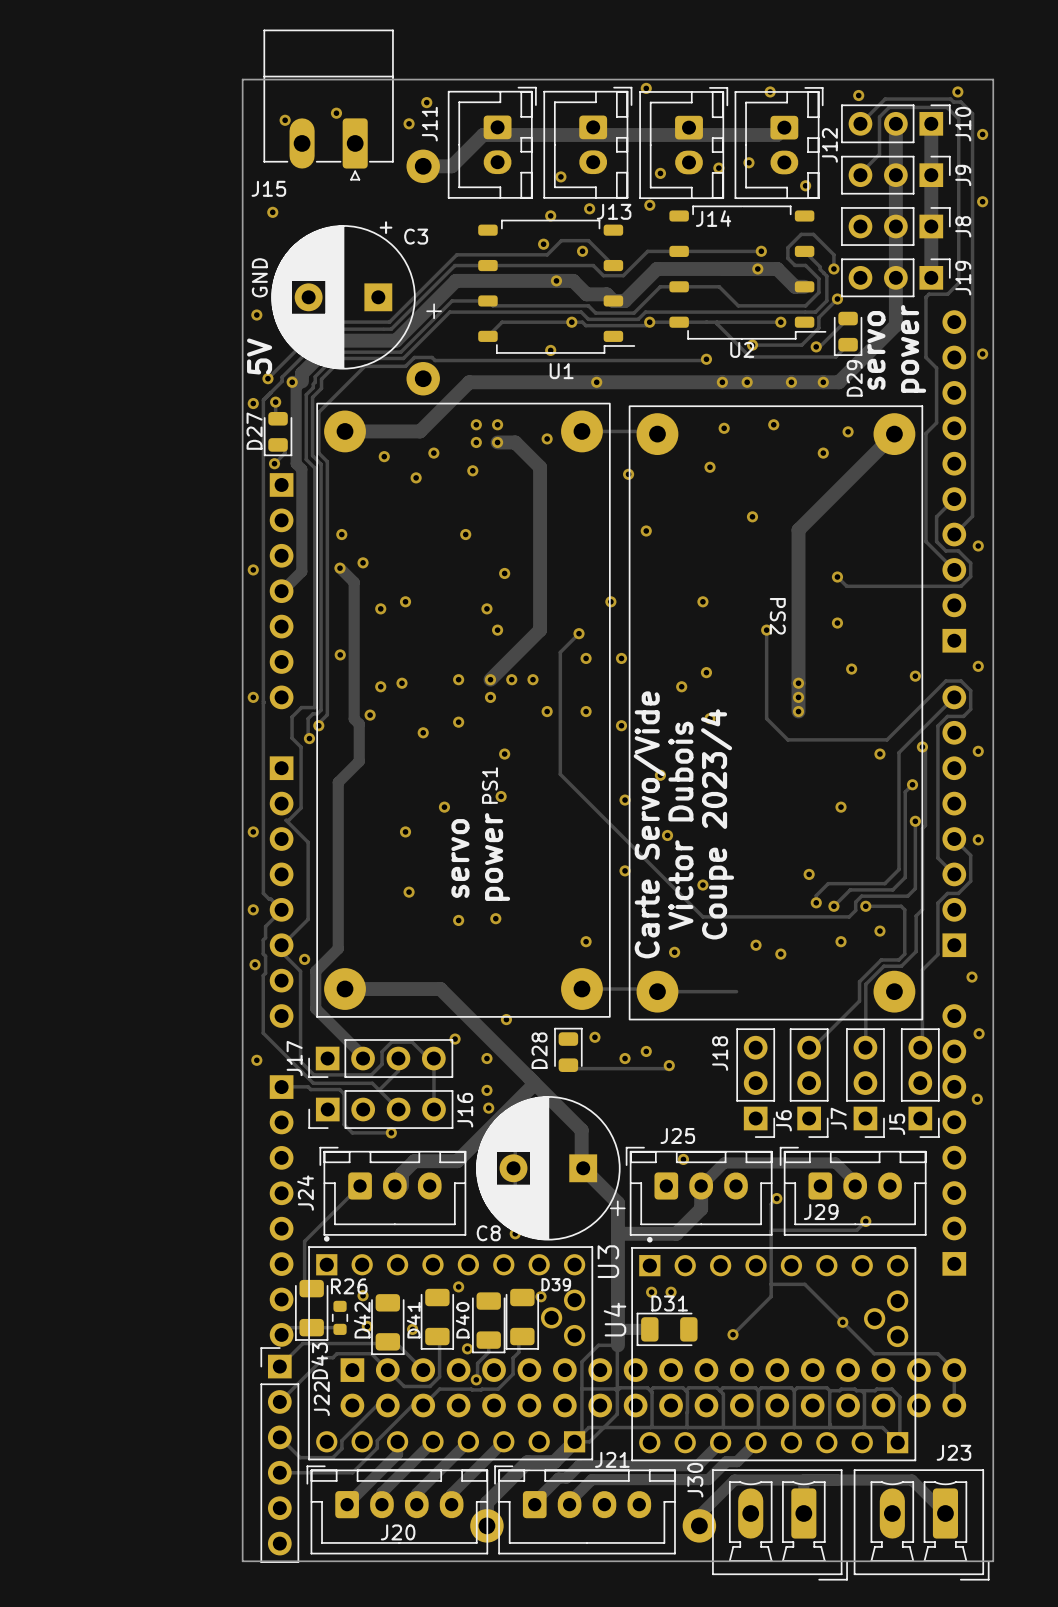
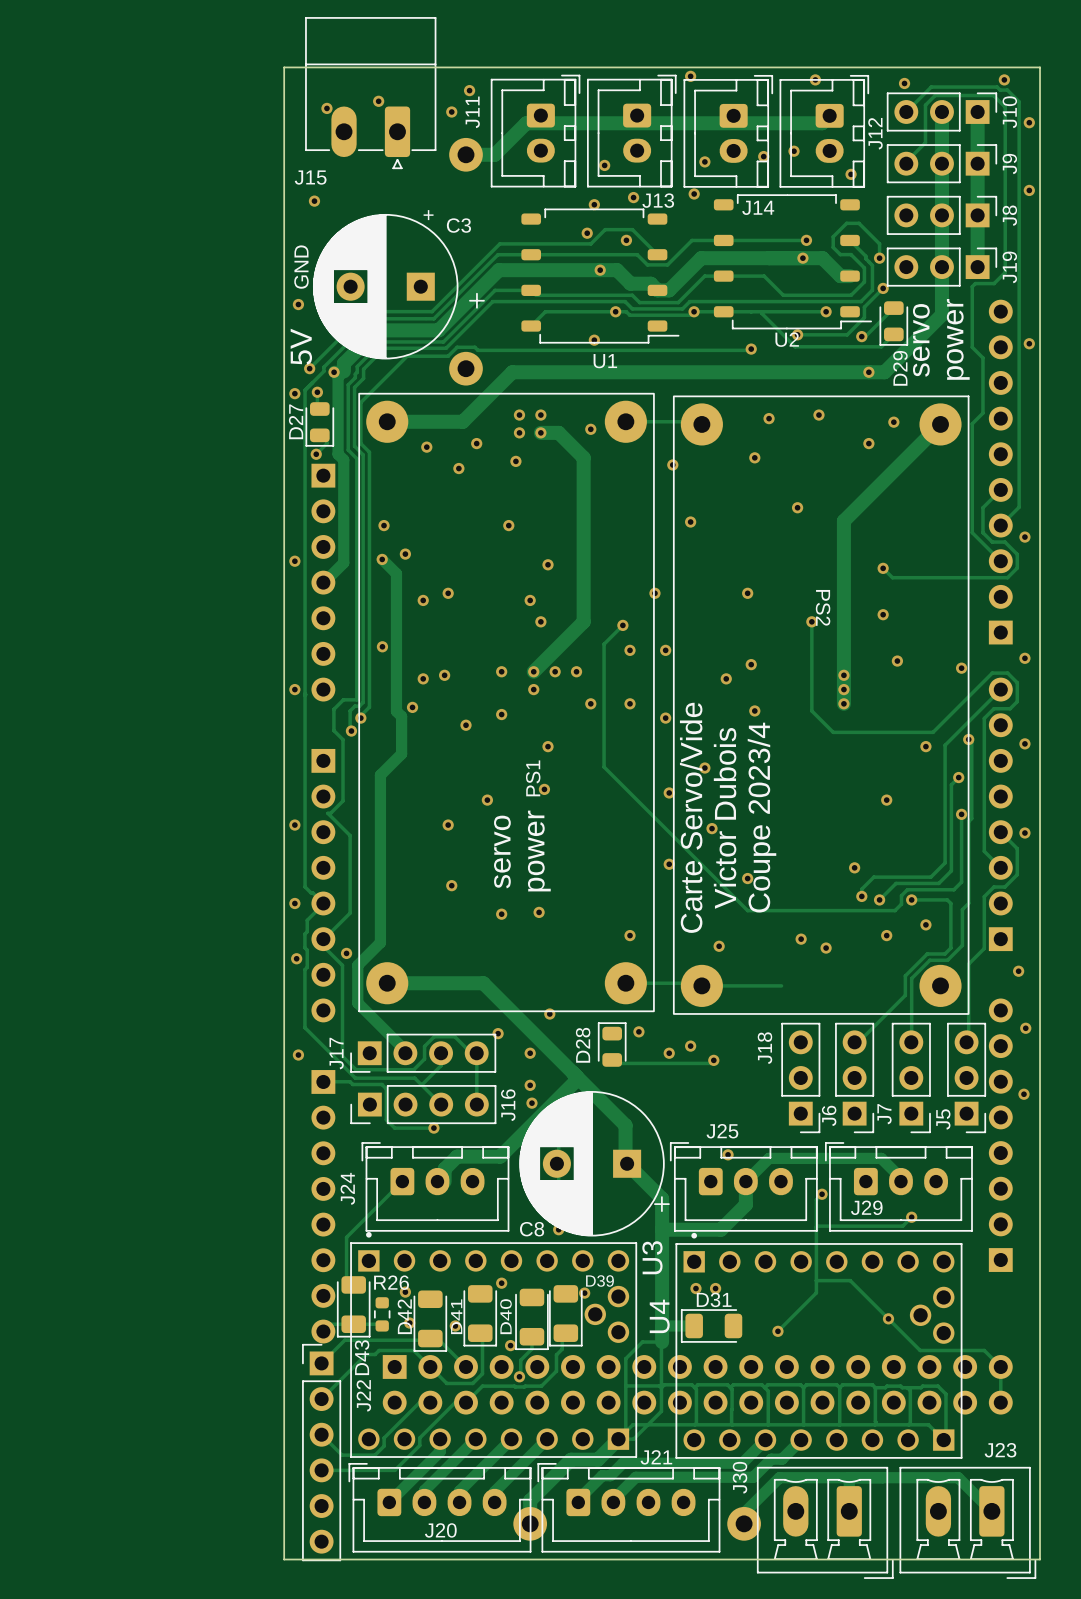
via: (596, 382) -> none
via: (722, 382) -> none
via: (747, 382) -> none
via: (791, 382) -> none

